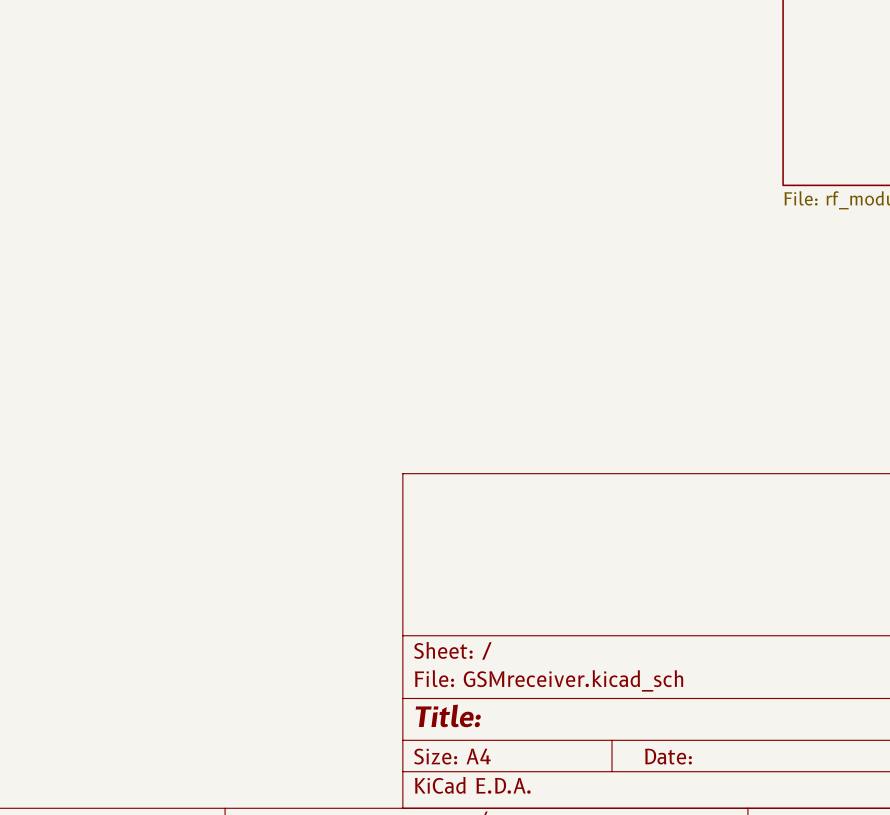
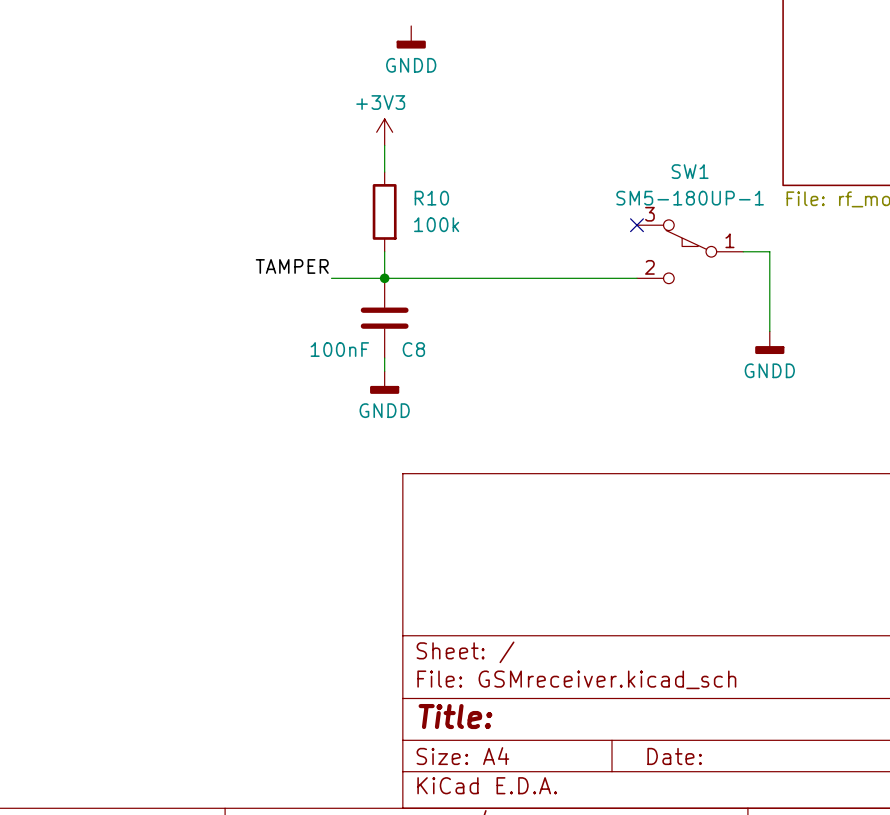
power symbol: none -> GNDD (411, 37)
power symbol: none -> +3V3 (384, 132)
wire: none -> (384, 145) (384, 172)
R10: none -> 100k (384, 211)
no-connect mark: none -> (636, 225)
wire: none -> (384, 251) (384, 278)
SW1: none -> SM5-180UP-1 (690, 251)
wire: none -> (743, 251) (769, 251) (769, 331)
label: none -> TAMPER (292, 266)
wire: none -> (331, 278) (636, 278)
junction: none -> (384, 278)
C8: none -> 100nF (384, 318)
power symbol: none -> GNDD (769, 342)
wire: none -> (384, 358) (384, 371)
power symbol: none -> GNDD (384, 382)

